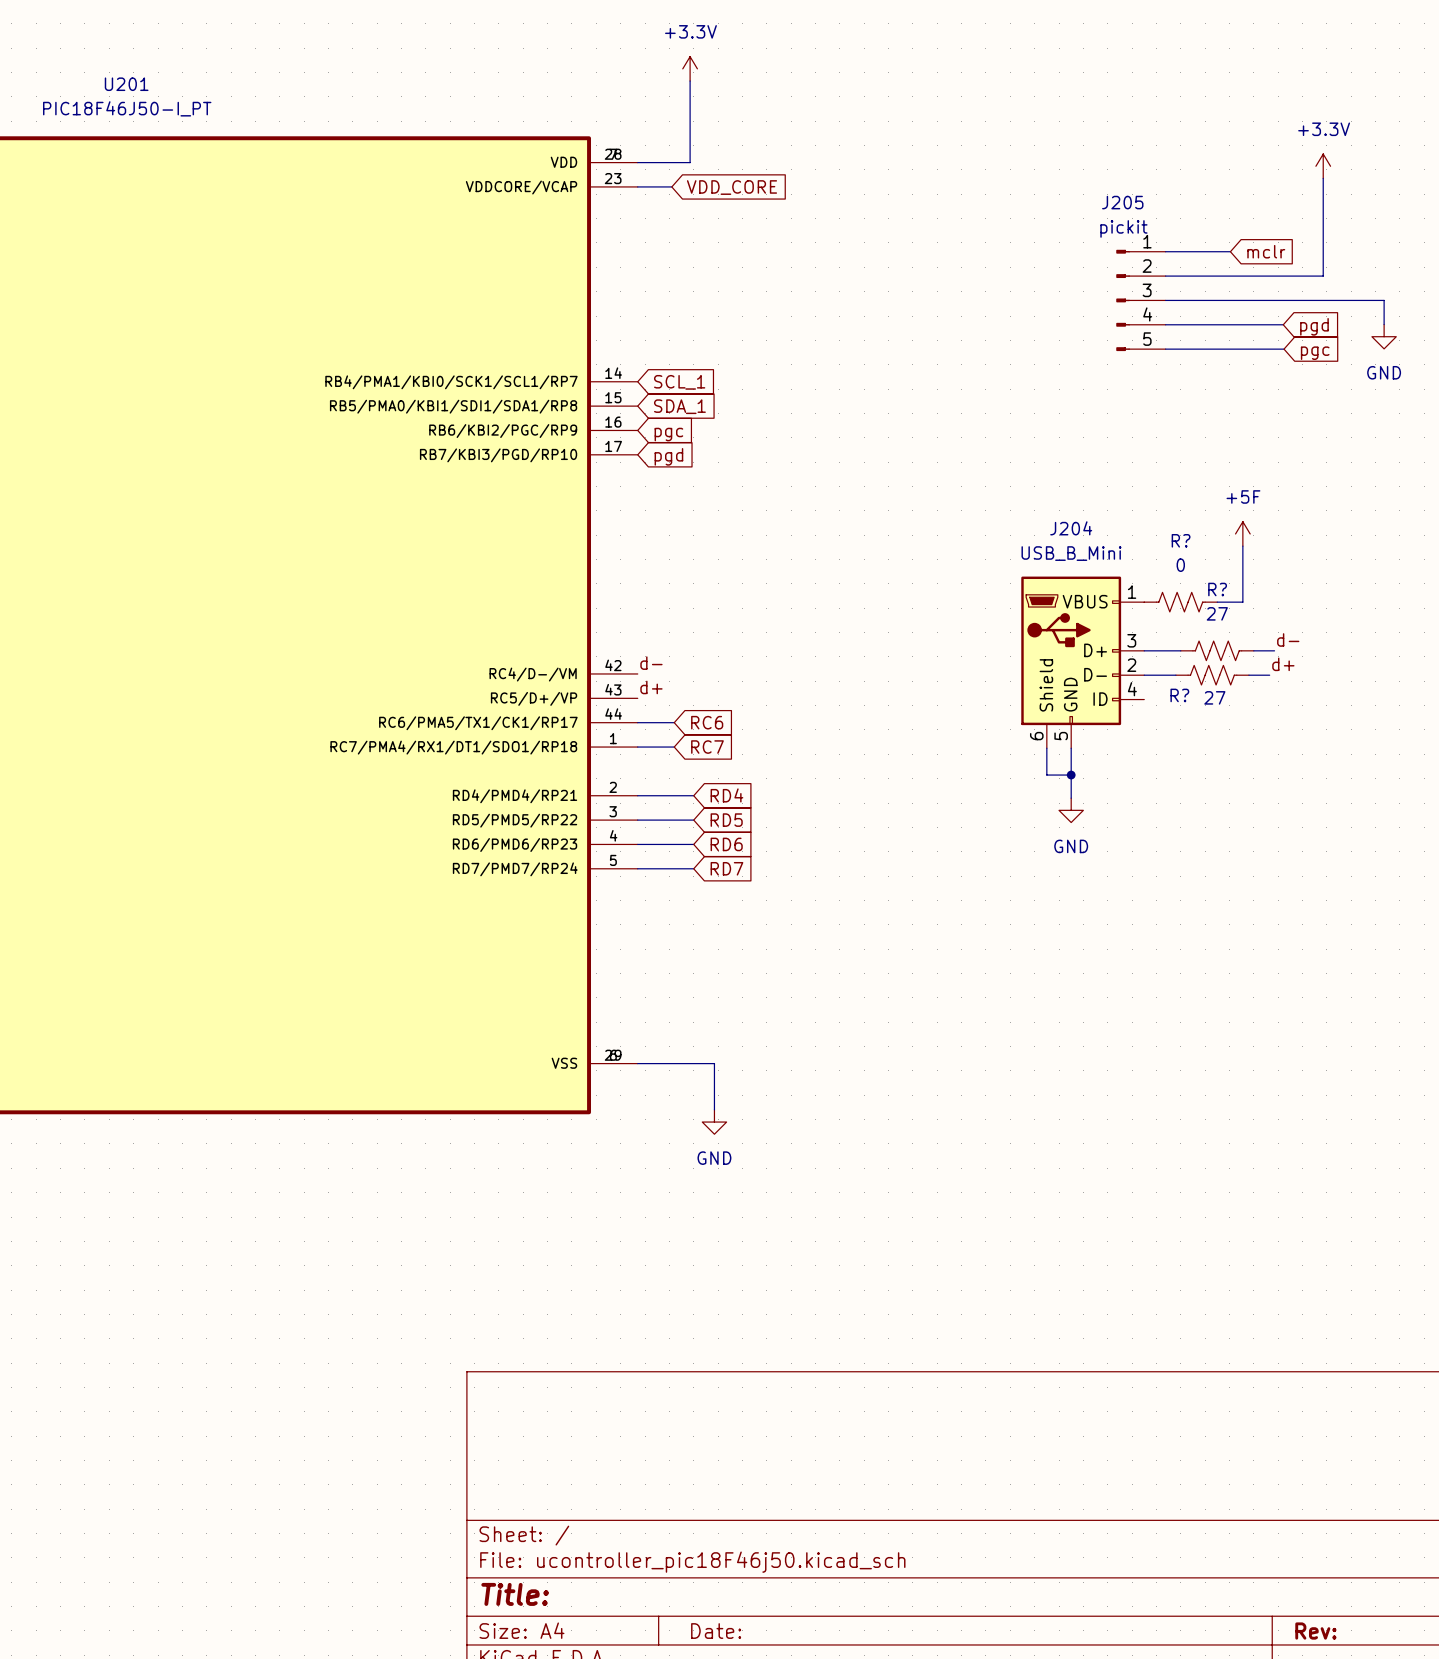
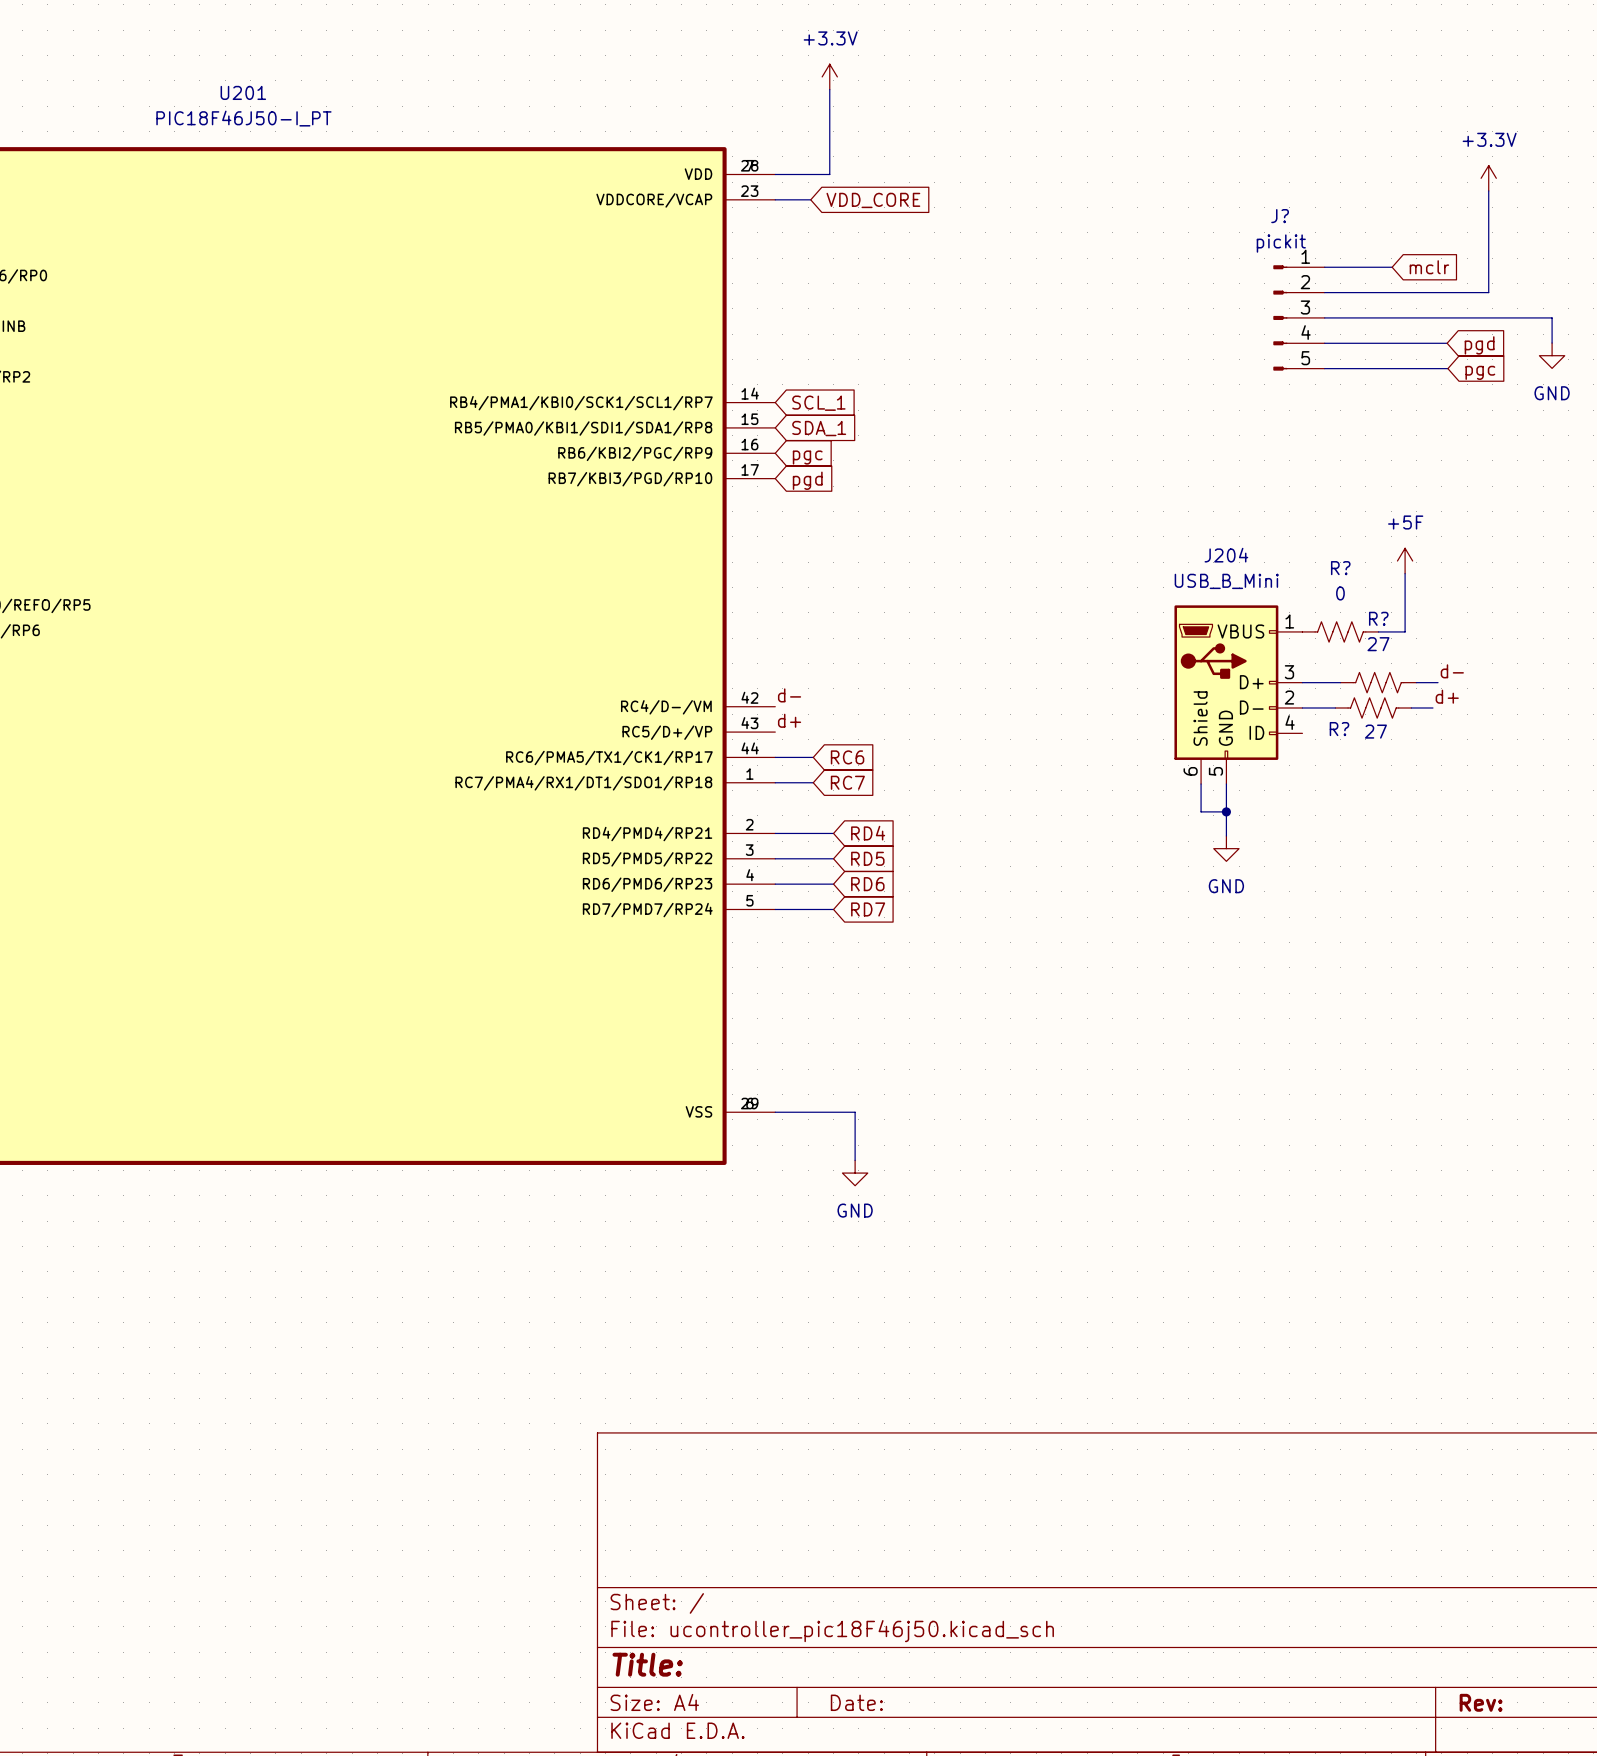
J205 name: J205 (1122, 202) -> J? (1280, 216)

